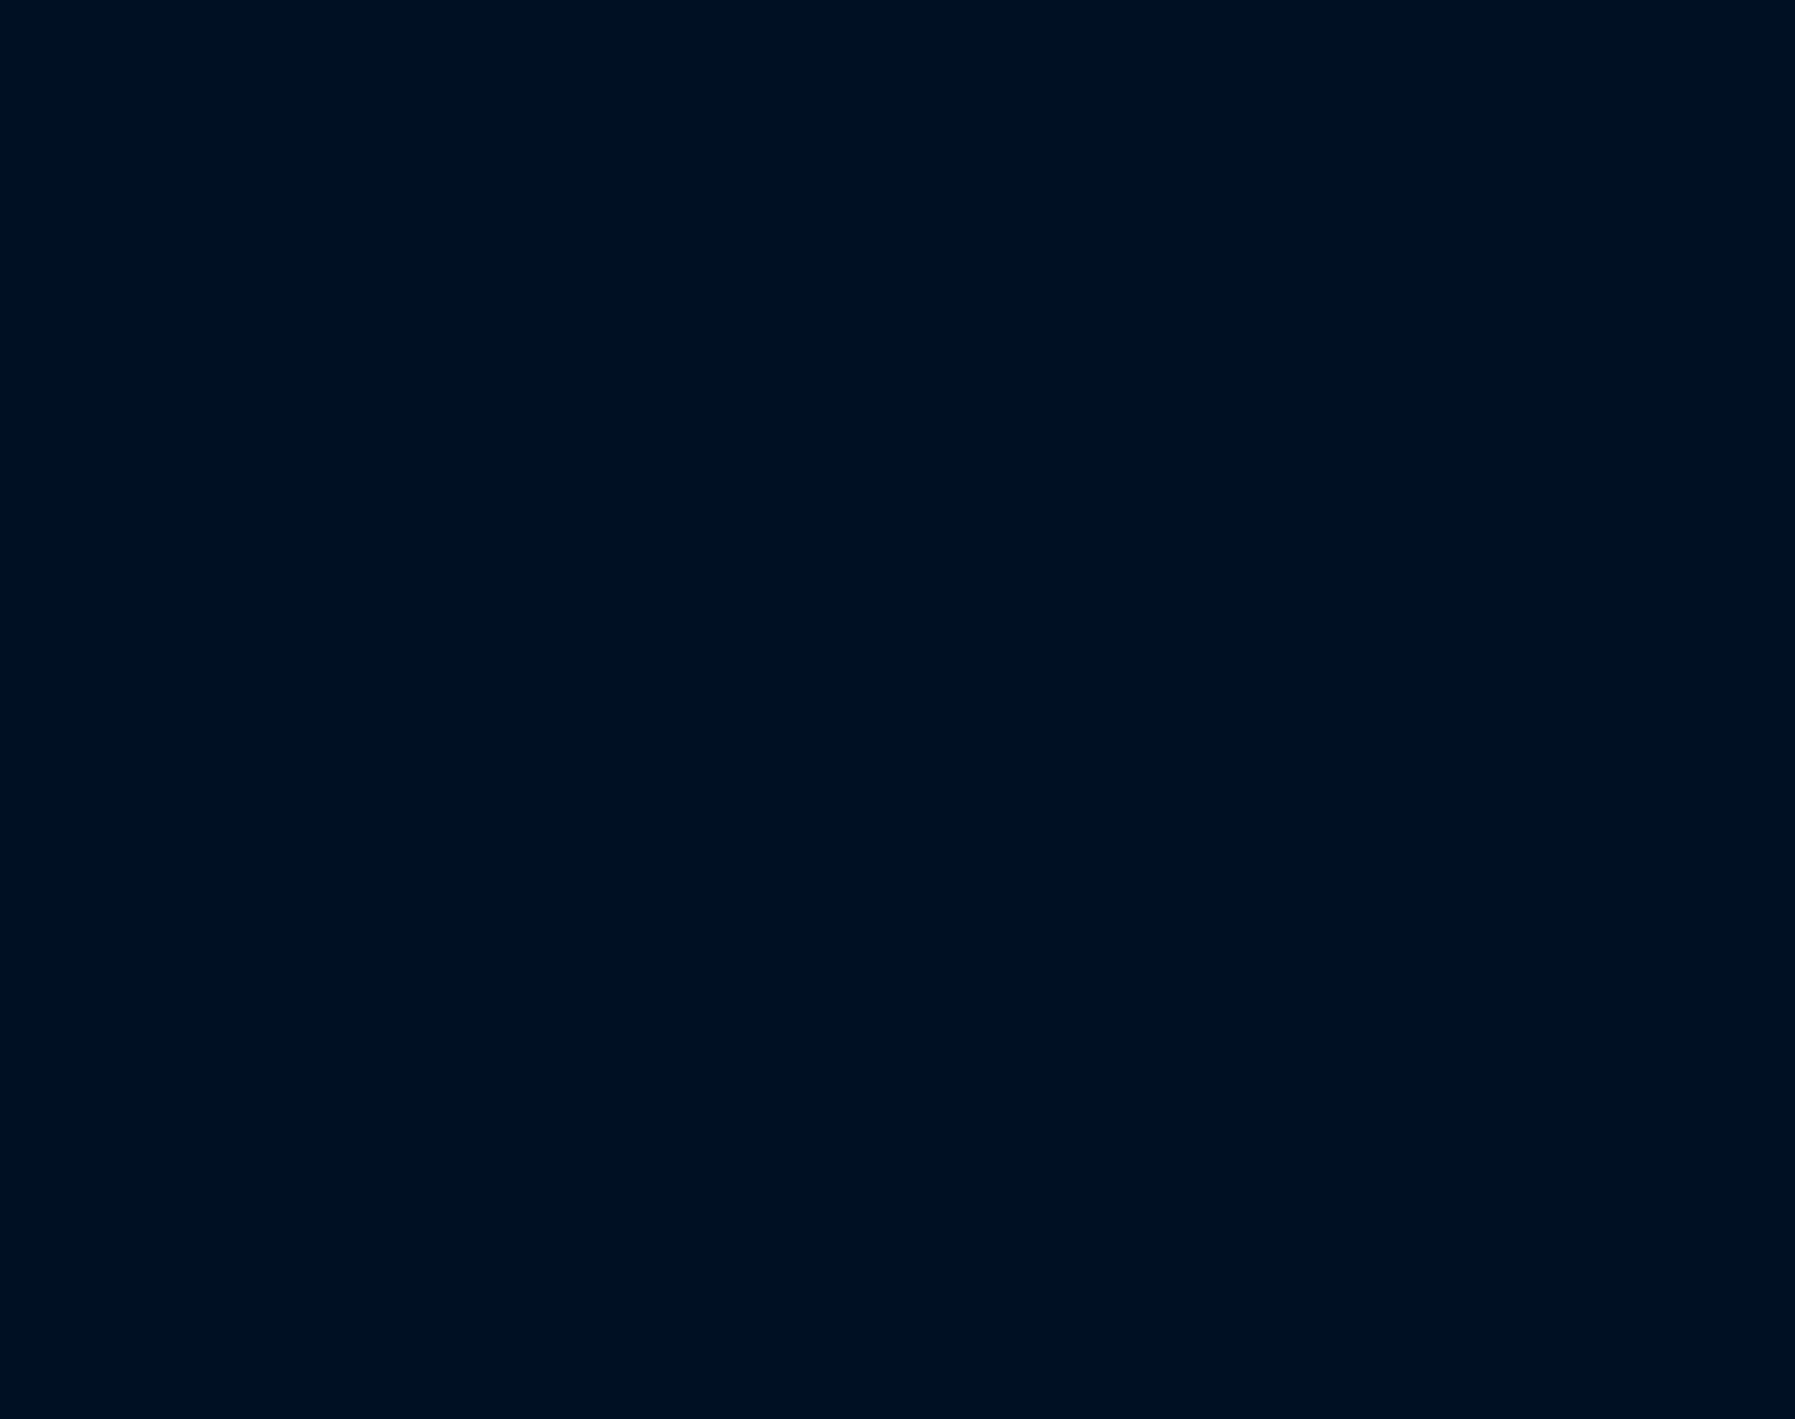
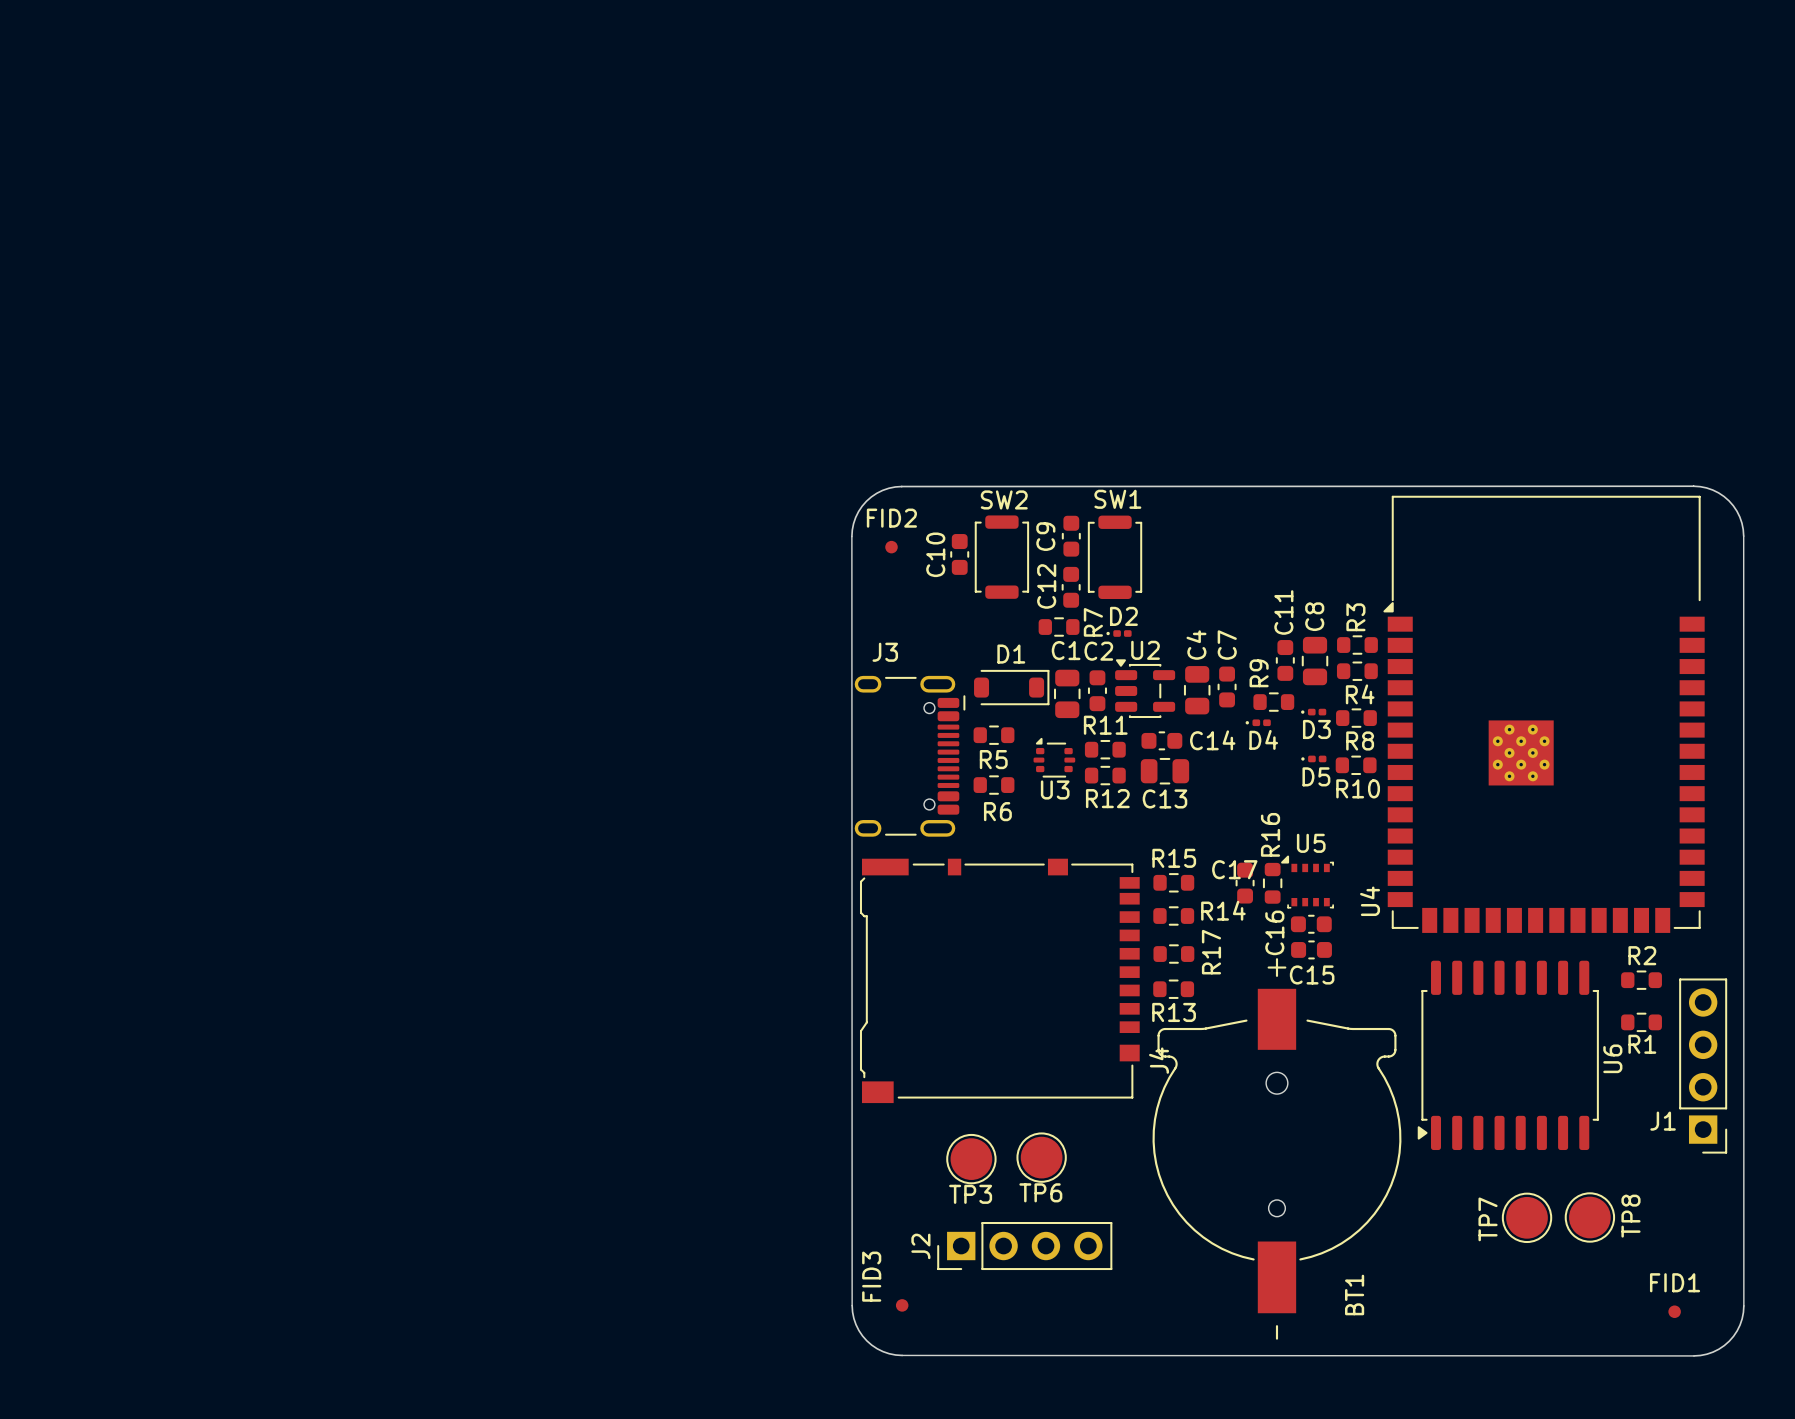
board edge: none -> (1693, 486) (901, 486) (882, 490) (866, 501) (855, 517) (851, 536) (852, 1305) (856, 1324) (866, 1340) (883, 1351) (902, 1355) (1693, 1355) (1713, 1352) (1729, 1341) (1740, 1325) (1743, 1305) (1743, 536) (1739, 517) (1728, 500) (1712, 490) (1693, 486)
C9: none -> (1071, 536)
FID2: none -> (891, 547)
C10: none -> (959, 554)
SW2: none -> (1001, 557)
SW1: none -> (1115, 557)
C12: none -> (1071, 587)
R7: none -> (1059, 627)
D2: none -> (1119, 633)
R3: none -> (1357, 645)
C11: none -> (1285, 660)
C8: none -> (1315, 661)
R4: none -> (1357, 671)
C7: none -> (1227, 686)
D1: none -> (1011, 687)
U2: none -> (1145, 688)
C2: none -> (1097, 690)
C4: none -> (1197, 690)
C1: none -> (1067, 693)
R9: none -> (1273, 702)
D3: none -> (1313, 712)
U4: none -> (1544, 714)
R8: none -> (1356, 718)
D4: none -> (1258, 722)
R5: none -> (994, 735)
C14: none -> (1161, 740)
R11: none -> (1105, 749)
J3: none -> (910, 756)
U3: none -> (1054, 757)
D5: none -> (1313, 758)
R10: none -> (1356, 765)
C13: none -> (1164, 771)
R12: none -> (1105, 775)
R6: none -> (994, 785)
R15: none -> (1173, 882)
U5: none -> (1307, 882)
C17: none -> (1245, 883)
R16: none -> (1272, 883)
R14: none -> (1173, 916)
C16: none -> (1311, 924)
C15: none -> (1311, 949)
R17: none -> (1173, 954)
J4: none -> (999, 980)
R2: none -> (1641, 980)
R13: none -> (1173, 989)
R1: none -> (1641, 1022)
U6: none -> (1508, 1055)
J1: none -> (1703, 1066)
BT1: none -> (1276, 1148)
TP6: none -> (1041, 1157)
TP3: none -> (971, 1159)
TP7: none -> (1527, 1217)
TP8: none -> (1589, 1217)
J2: none -> (1024, 1246)
FID3: none -> (902, 1305)
FID1: none -> (1674, 1311)

